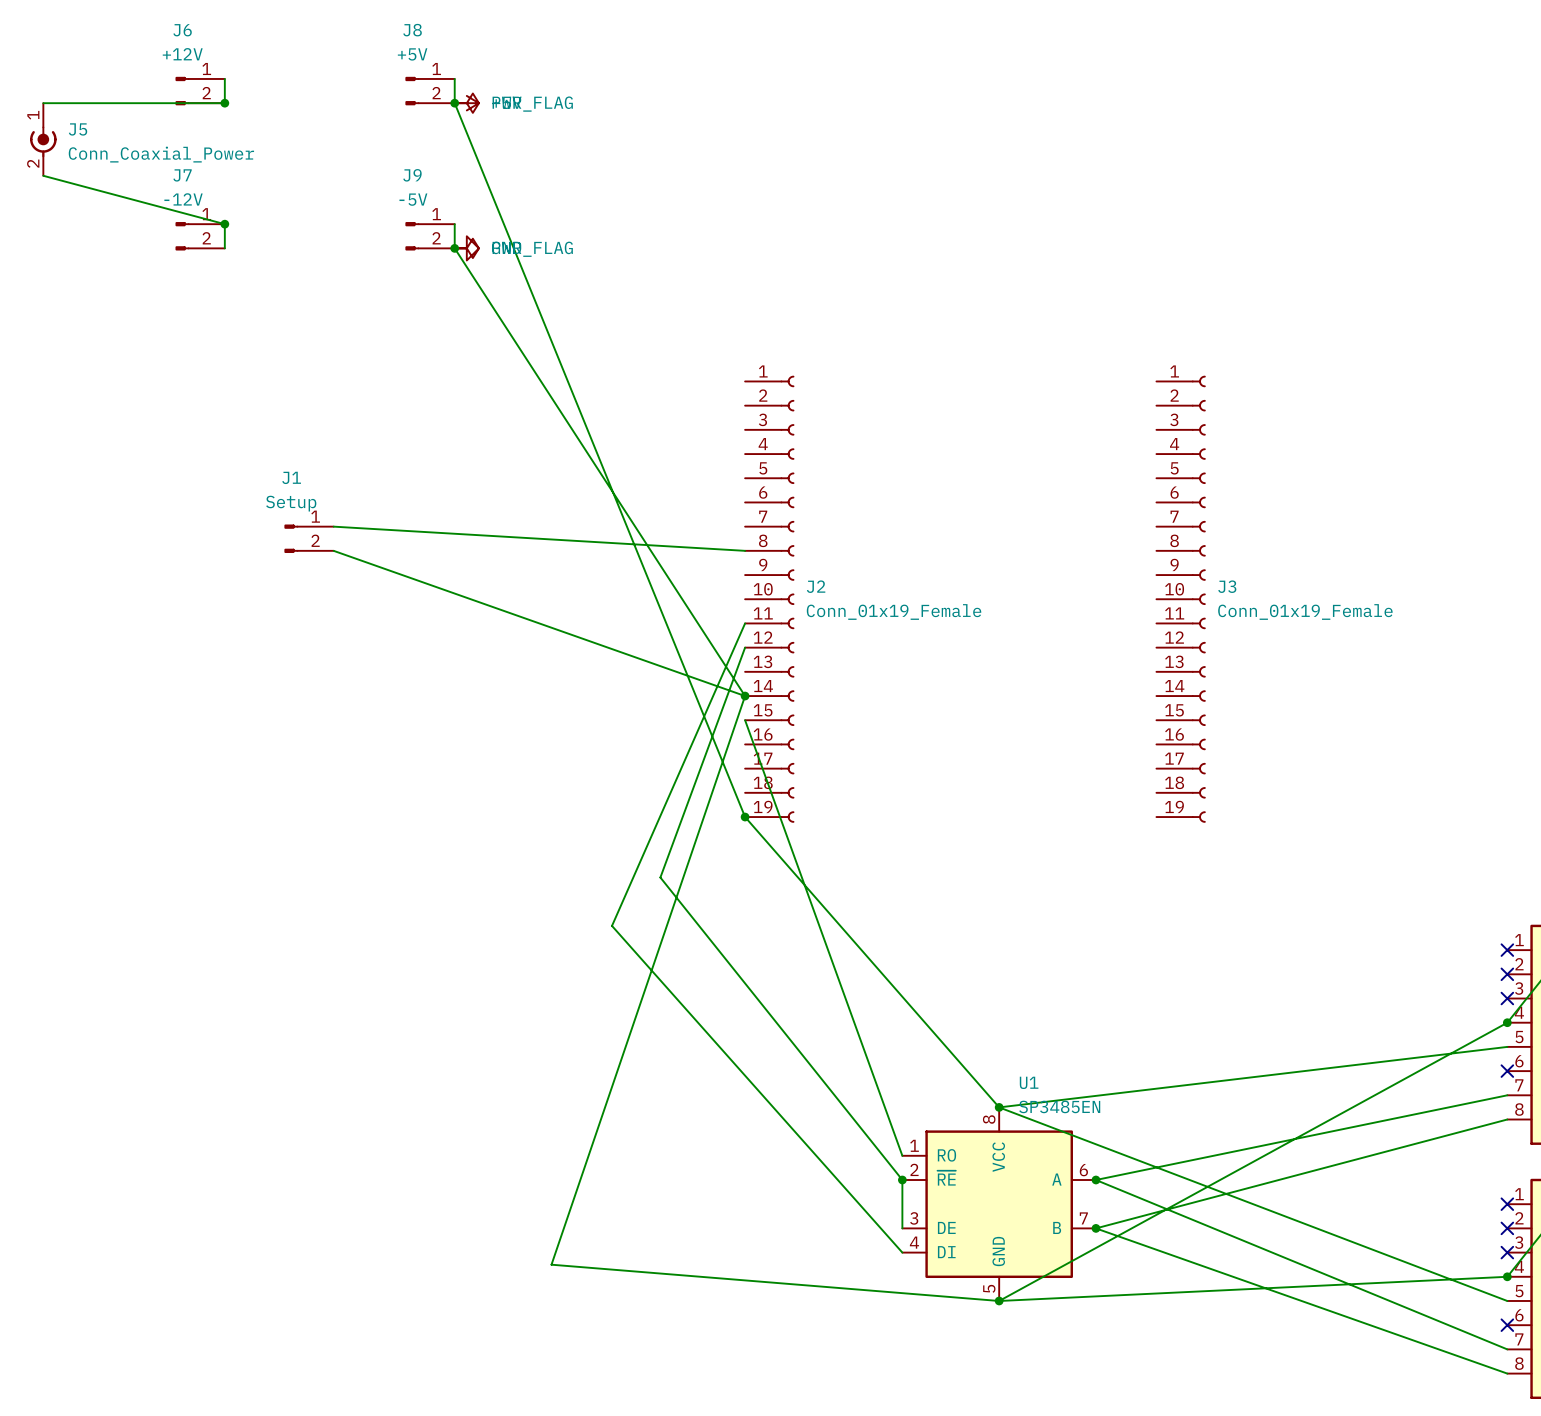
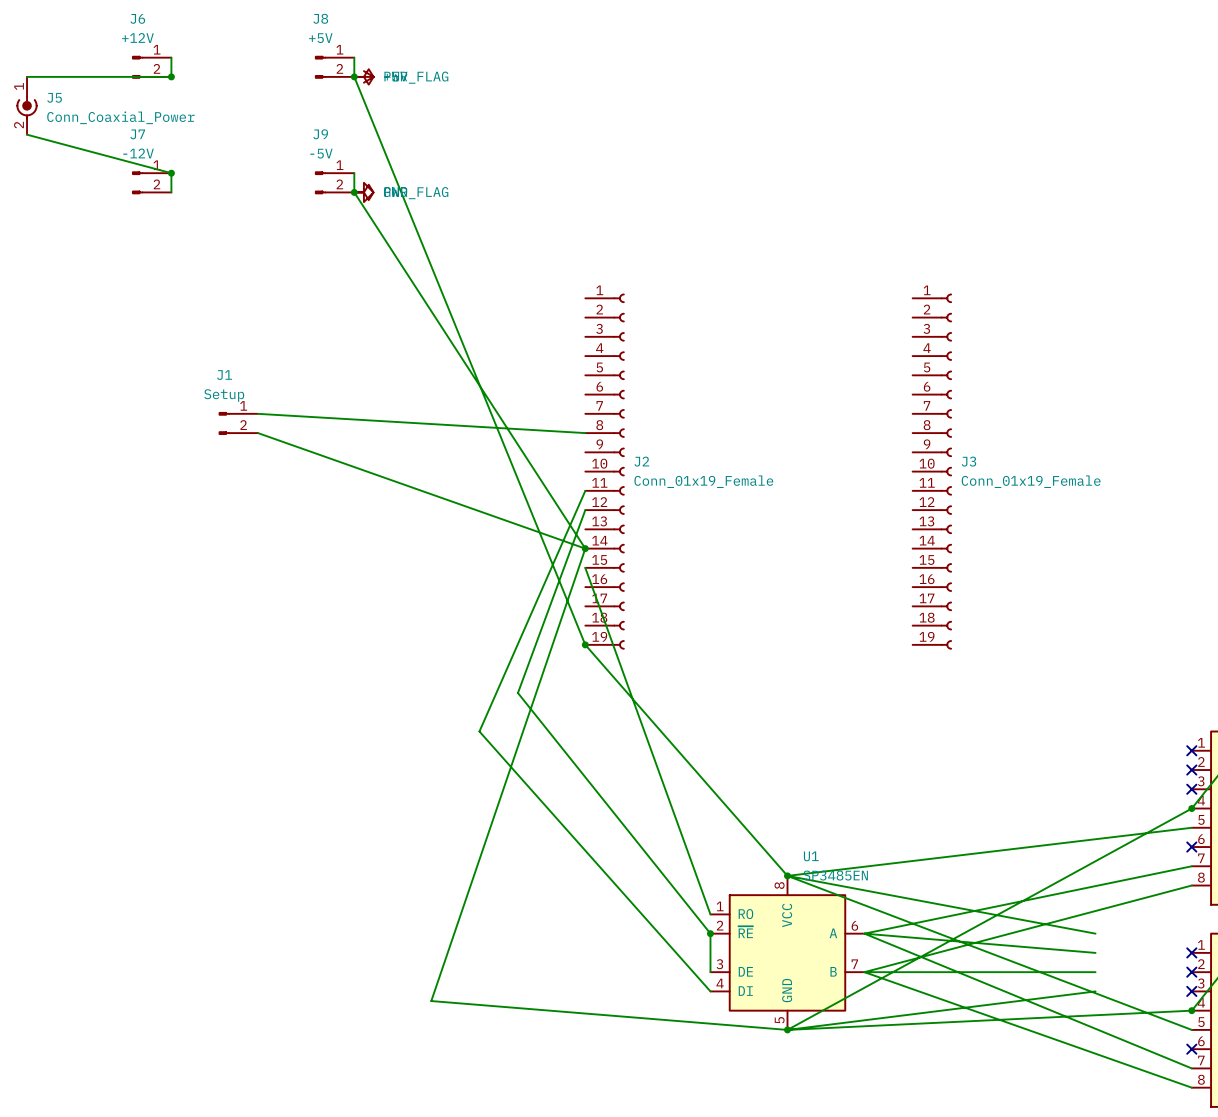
wire: none -> (787, 875) (1095, 933)
wire: none -> (864, 933) (1095, 952)
junction: (1095, 1180) -> none
wire: none -> (864, 972) (1095, 972)
junction: (1095, 1228) -> none
wire: none -> (1095, 991) (787, 1029)

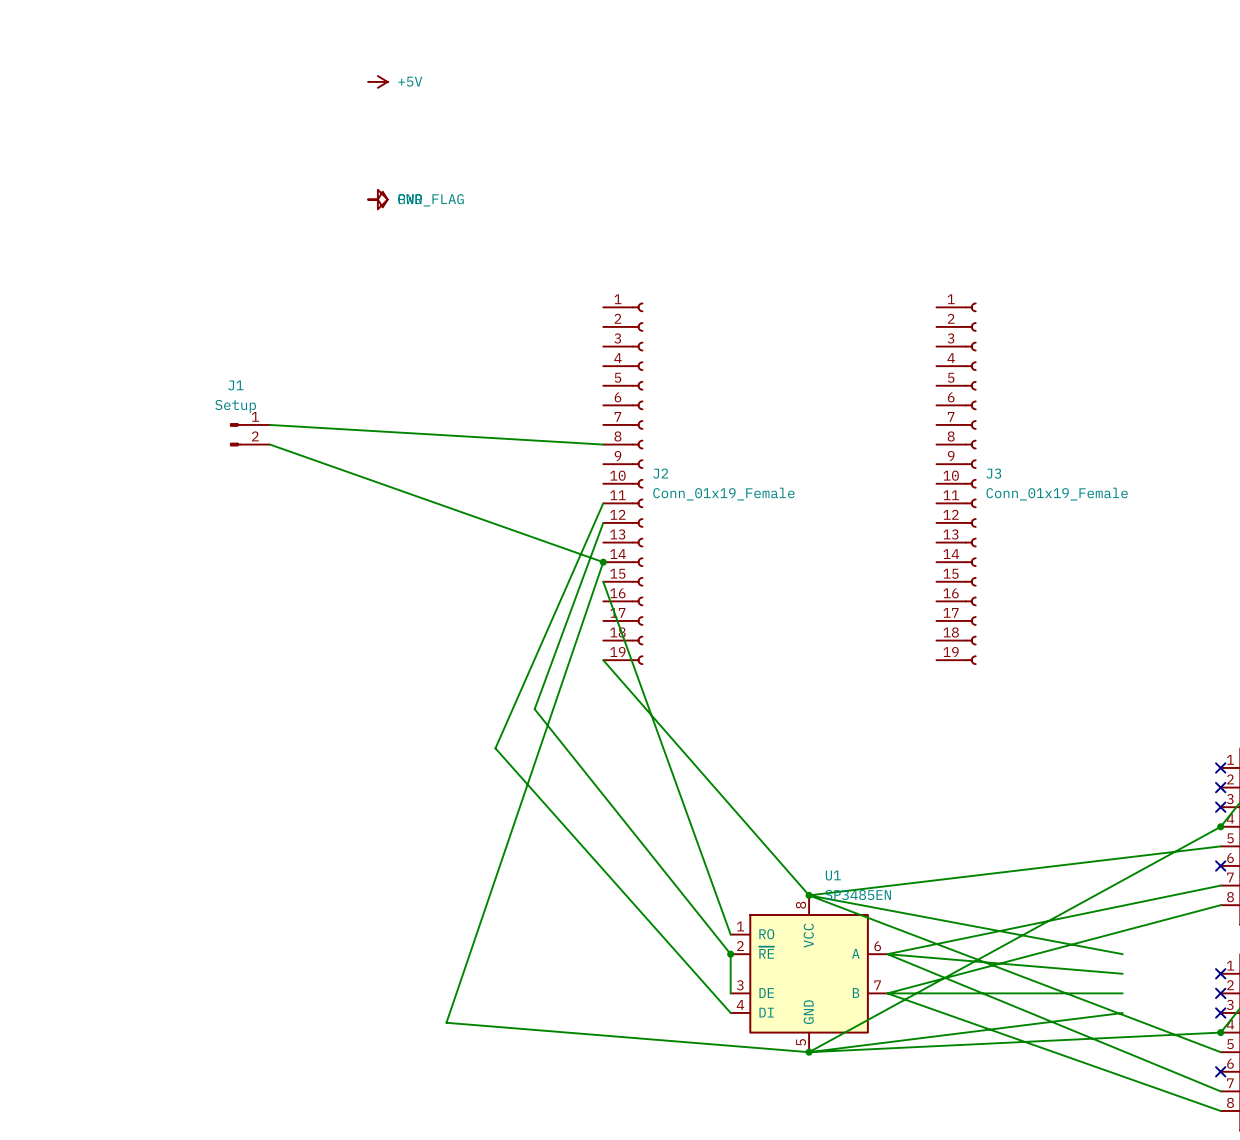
wire: (171, 57) (171, 76) (27, 76) -> none
wire: (354, 57) (354, 76) (585, 644) -> none
J6: +12V (151, 67) -> none
J8: +5V (334, 67) -> none
junction: (171, 76) -> none
junction: (354, 76) -> none
power symbol: PWR_FLAG (363, 76) -> none
J5: Conn_Coaxial_Power (27, 105) -> none
wire: (27, 134) (171, 173) (171, 192) -> none
junction: (171, 173) -> none
wire: (354, 173) (354, 192) (585, 548) -> none
J7: -12V (151, 182) -> none
J9: -5V (334, 182) -> none
junction: (354, 192) -> none
junction: (585, 644) -> none

